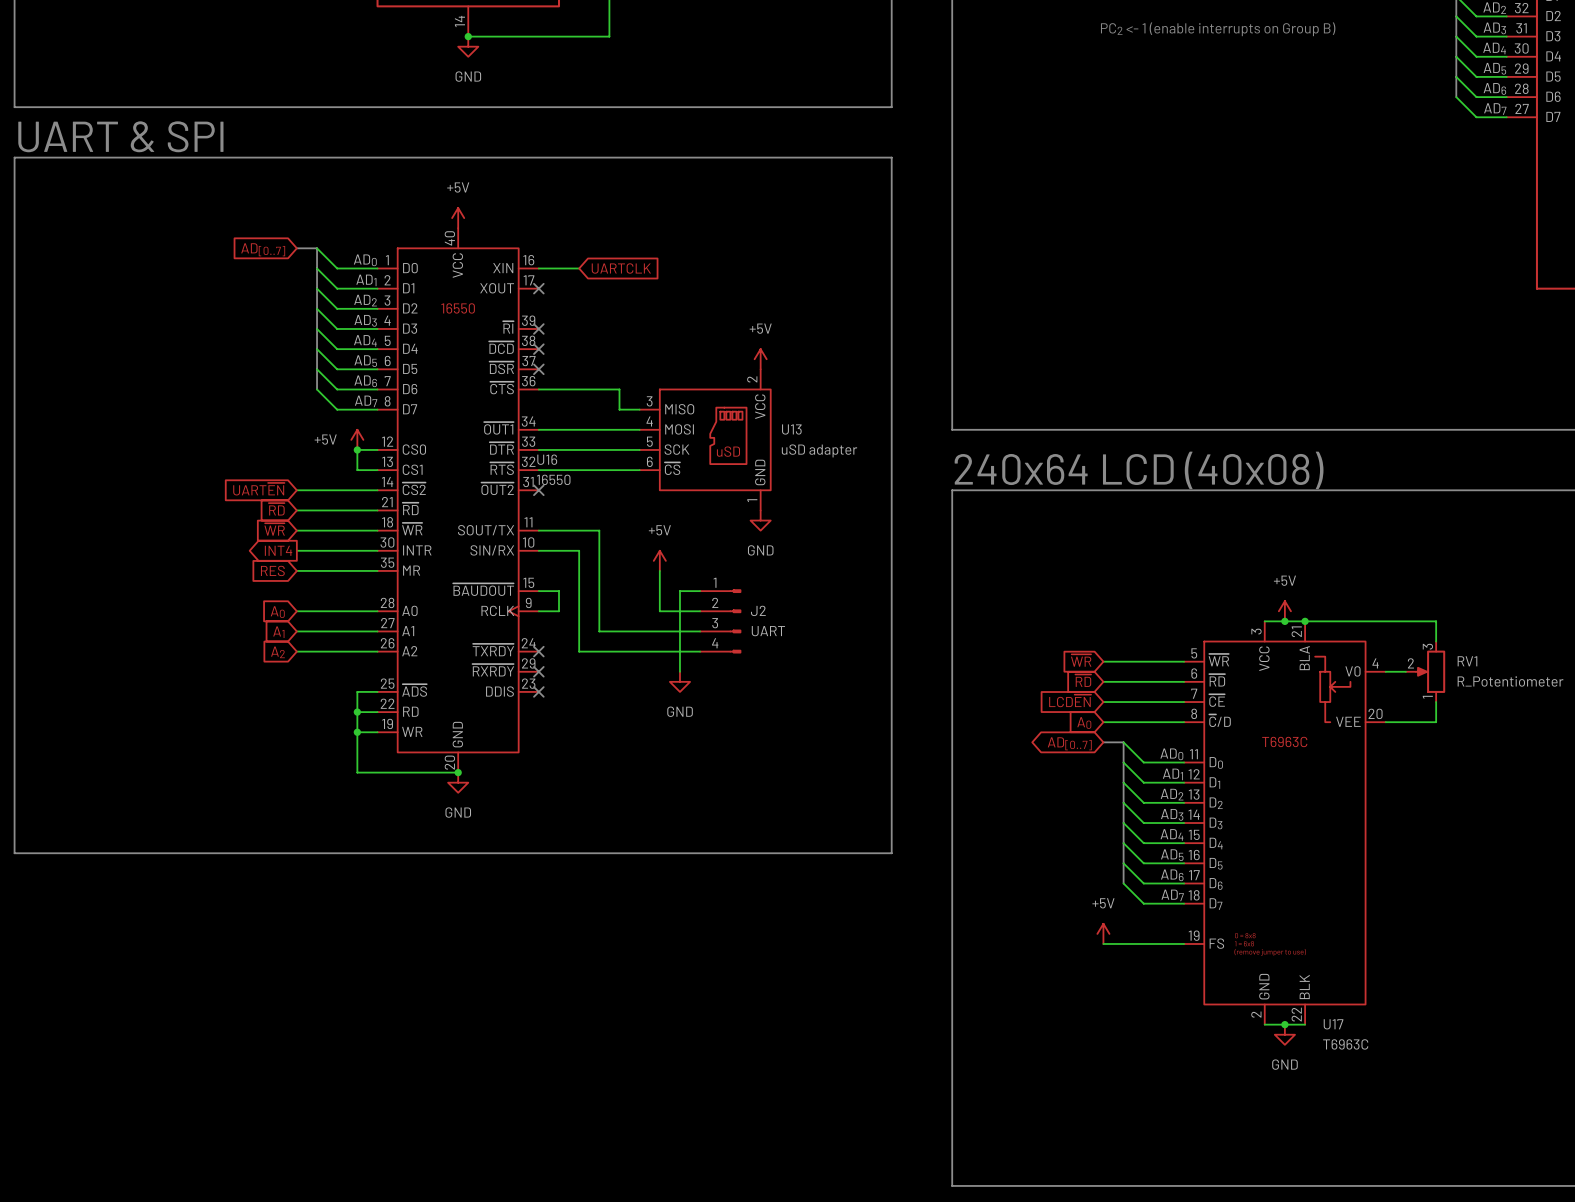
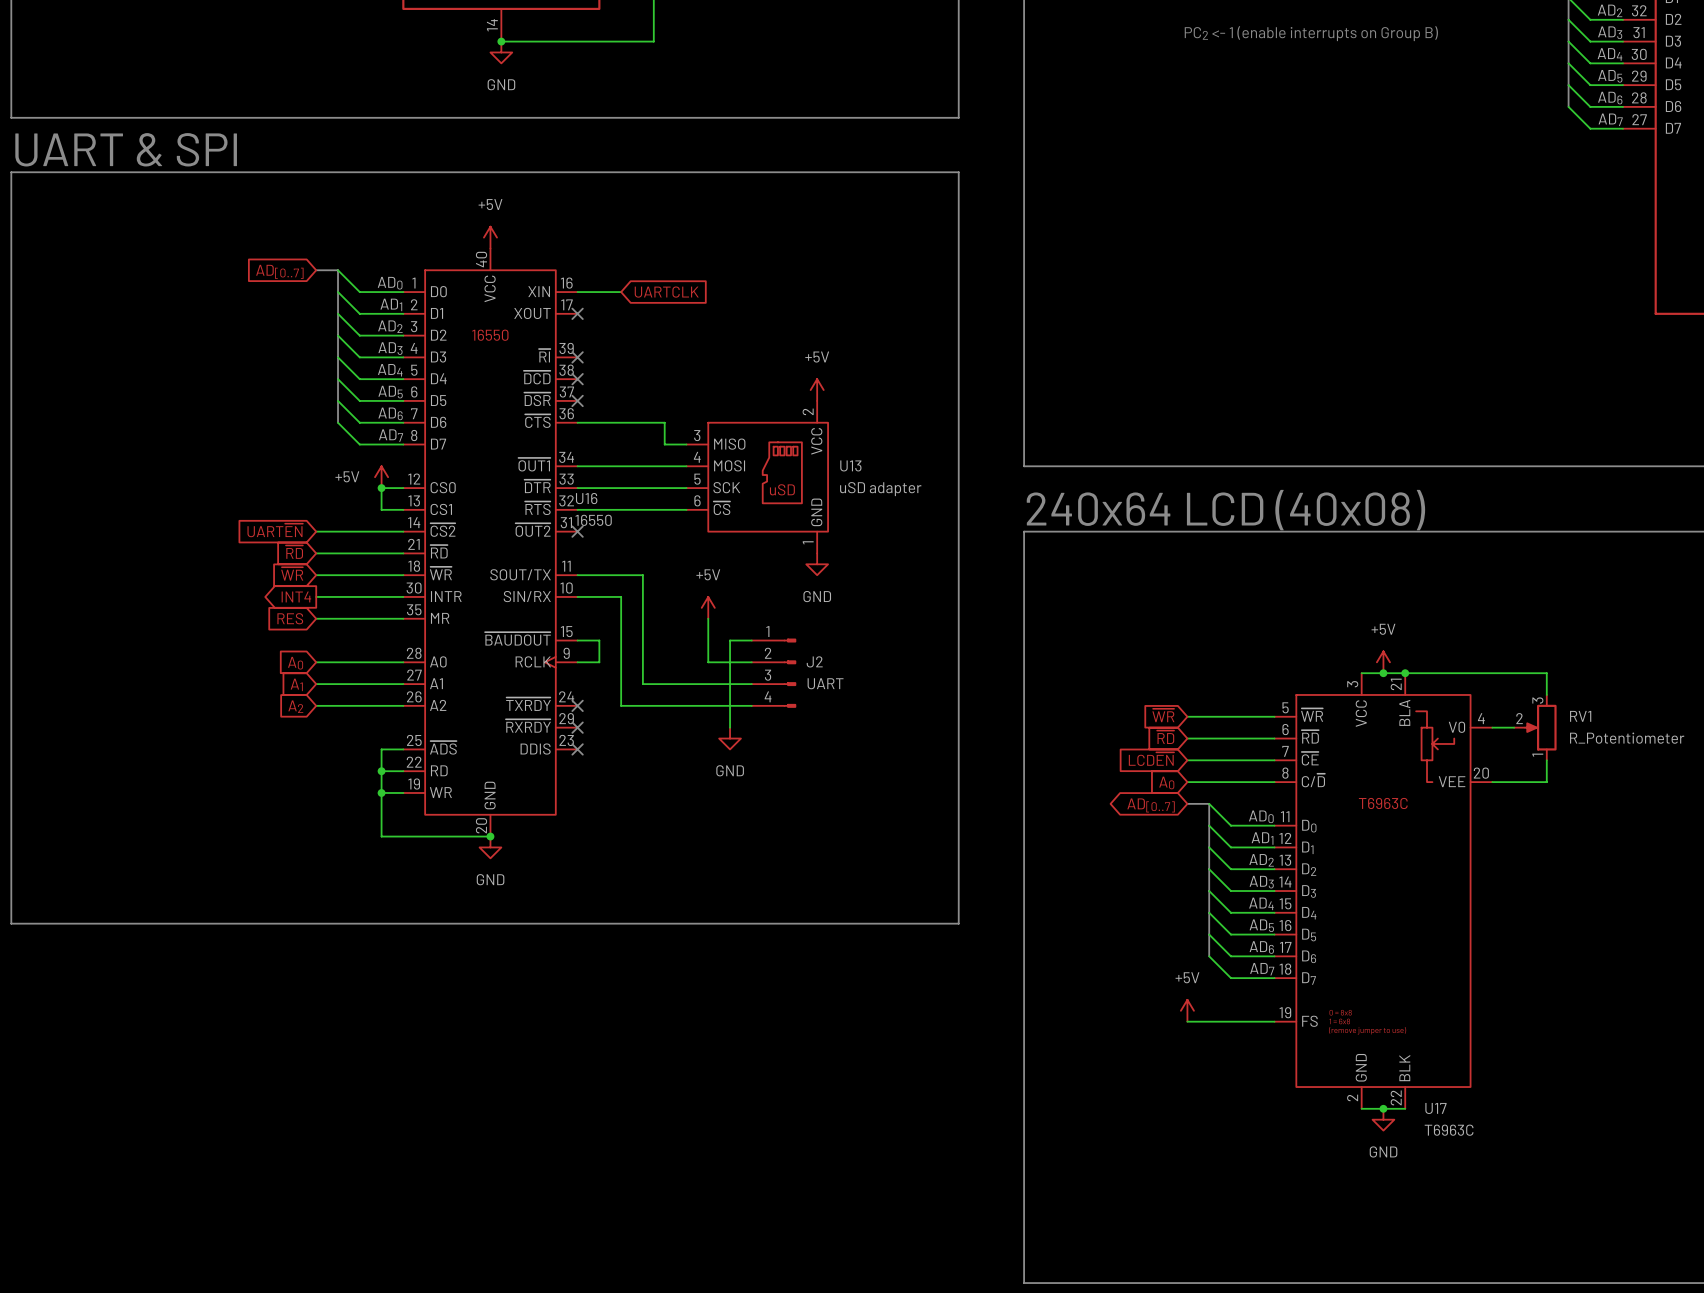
U17 pin name: ~{C}/D (1220, 720) -> C/~{D} (1313, 780)

